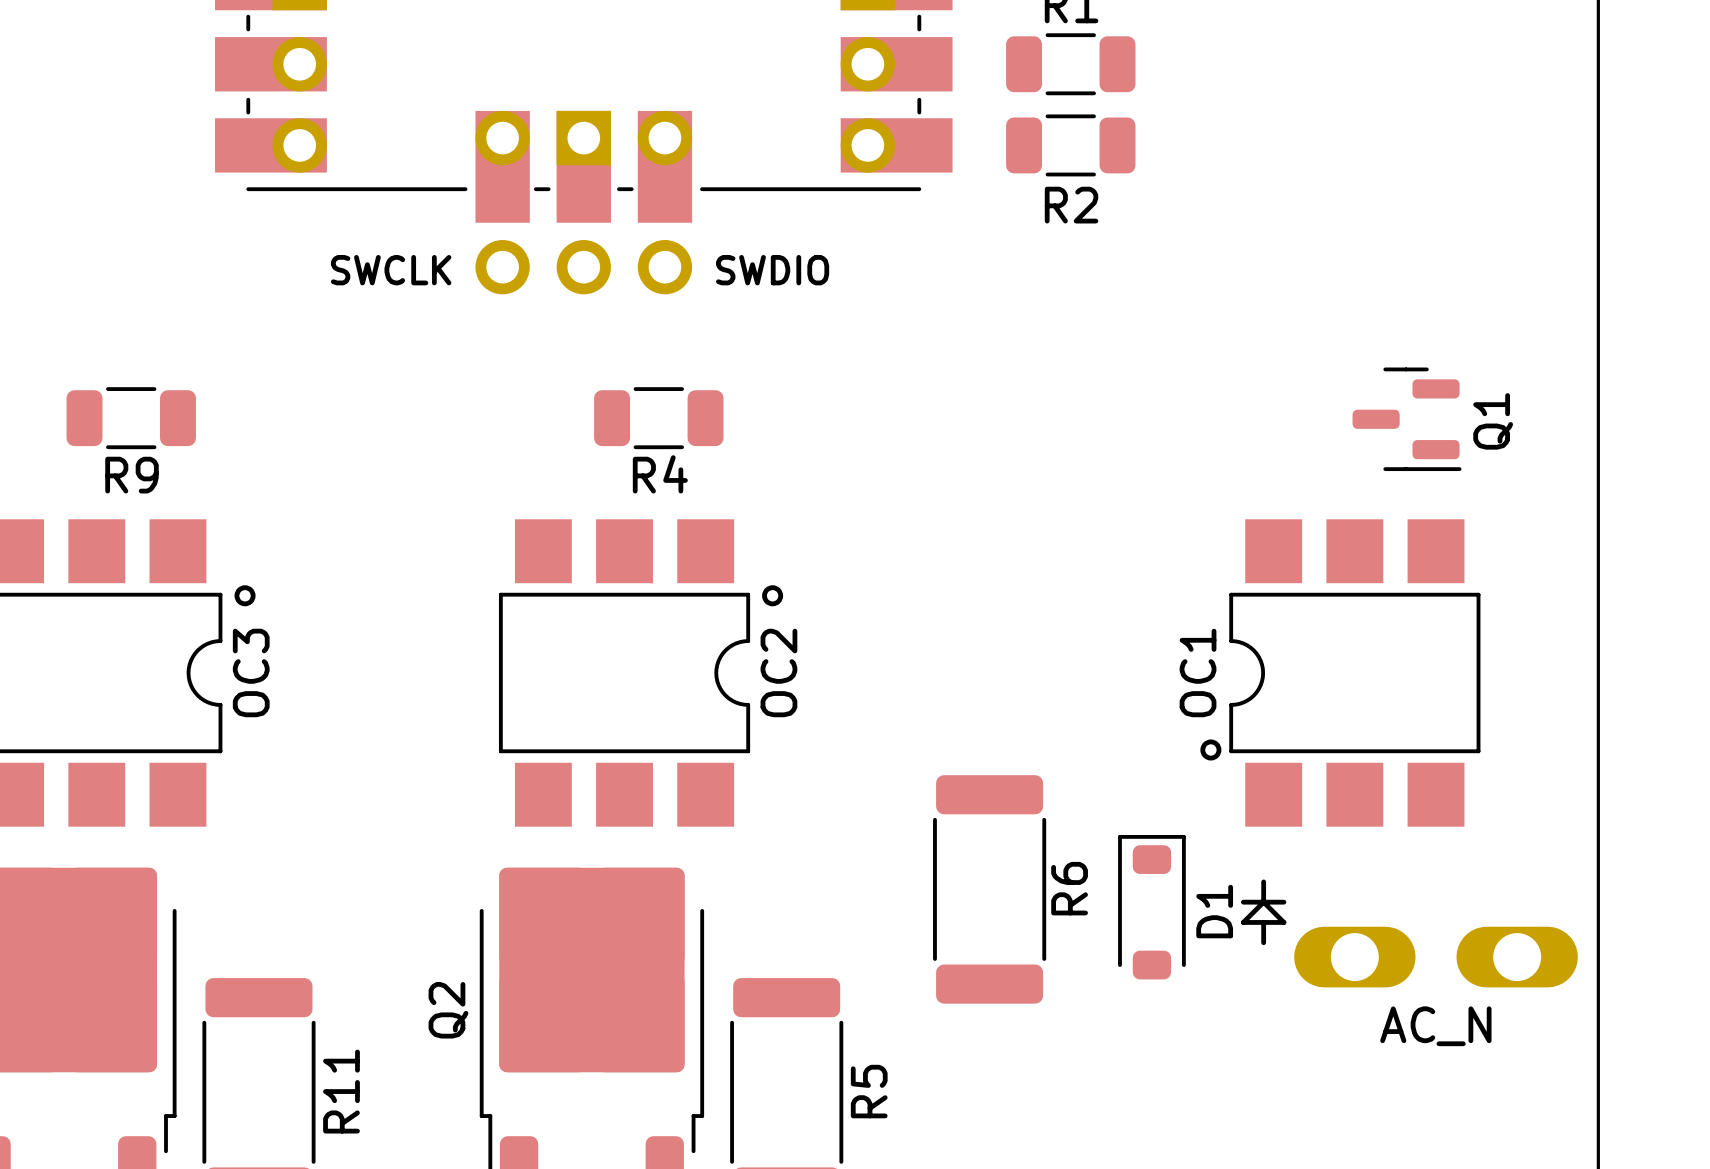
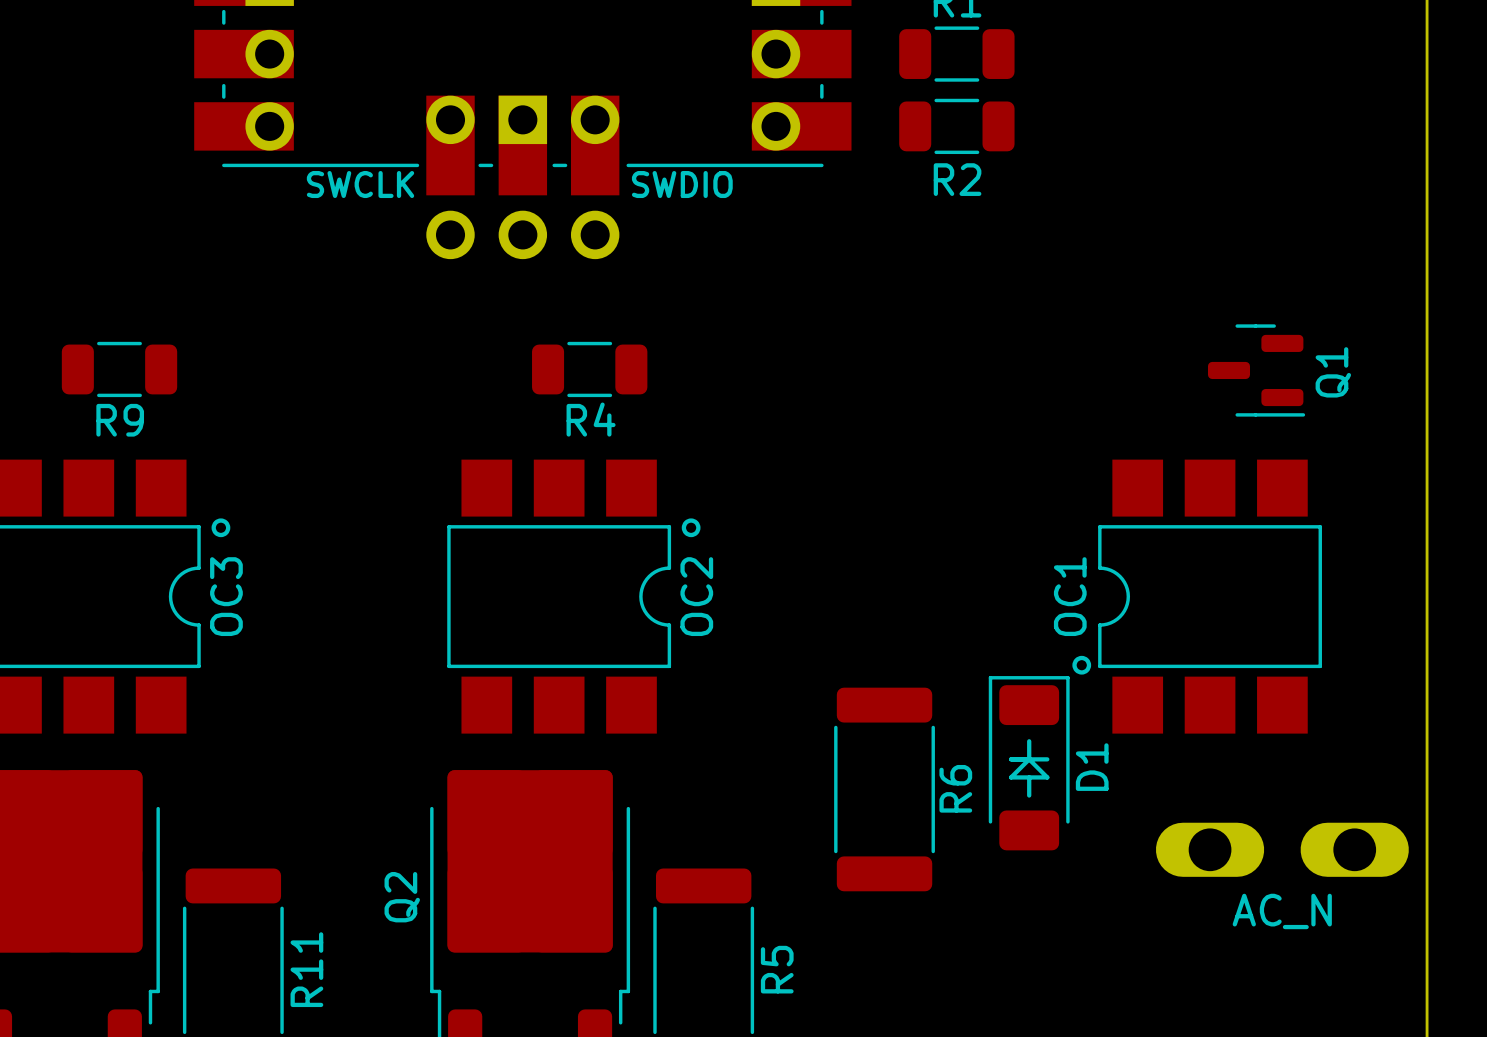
part text position: SWCLK (391, 270) -> SWCLK (360, 184)
part text position: SWDIO (772, 270) -> SWDIO (682, 184)
D1 footprint: [1118, 834, 1186, 980] -> [988, 676, 1070, 851]
line: (1263, 881) (1263, 902) -> (1029, 777) (1029, 795)
line: (1243, 902) (1283, 902) -> (1011, 759) (1047, 759)
line: (1263, 902) (1283, 922) (1243, 922) (1263, 902) -> (1029, 759) (1047, 777) (1011, 777) (1029, 759)
line: (1263, 922) (1263, 942) -> (1029, 741) (1029, 759)

